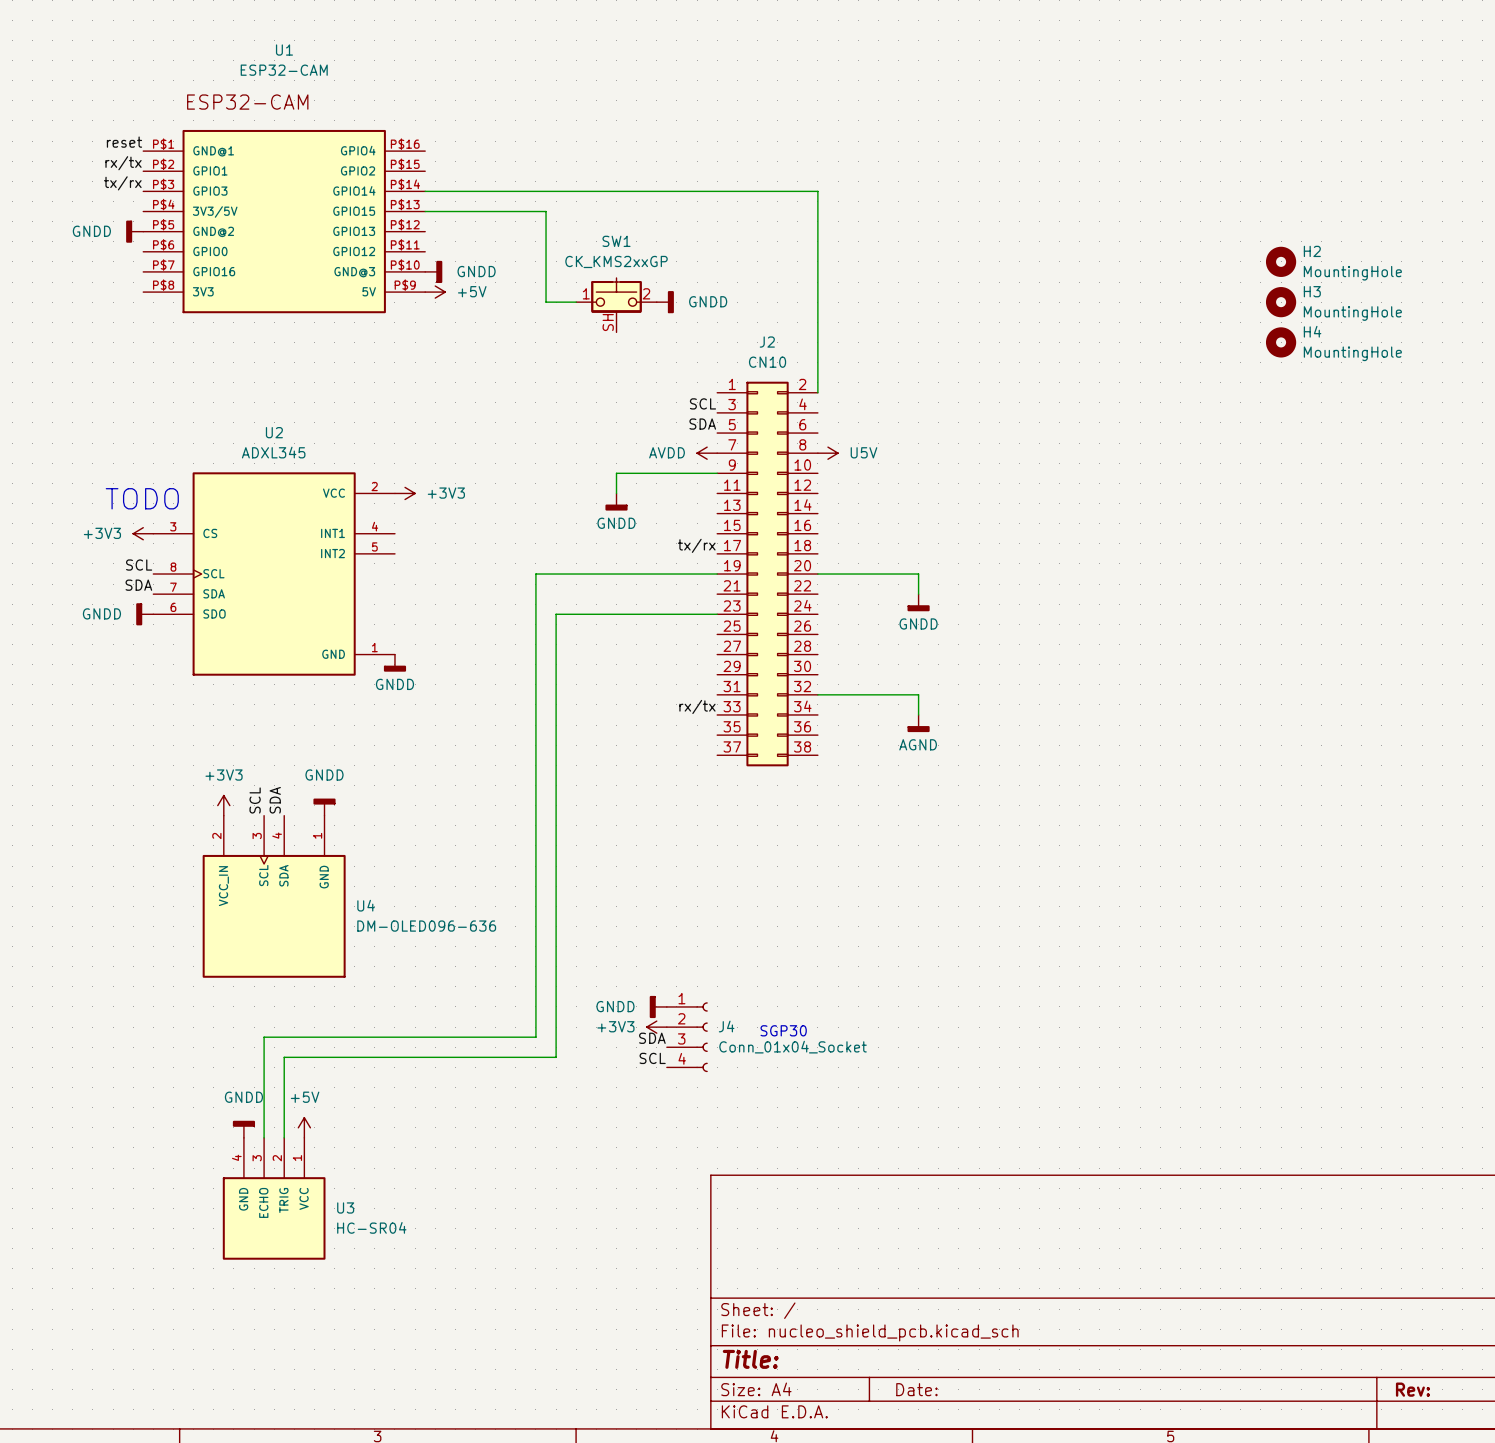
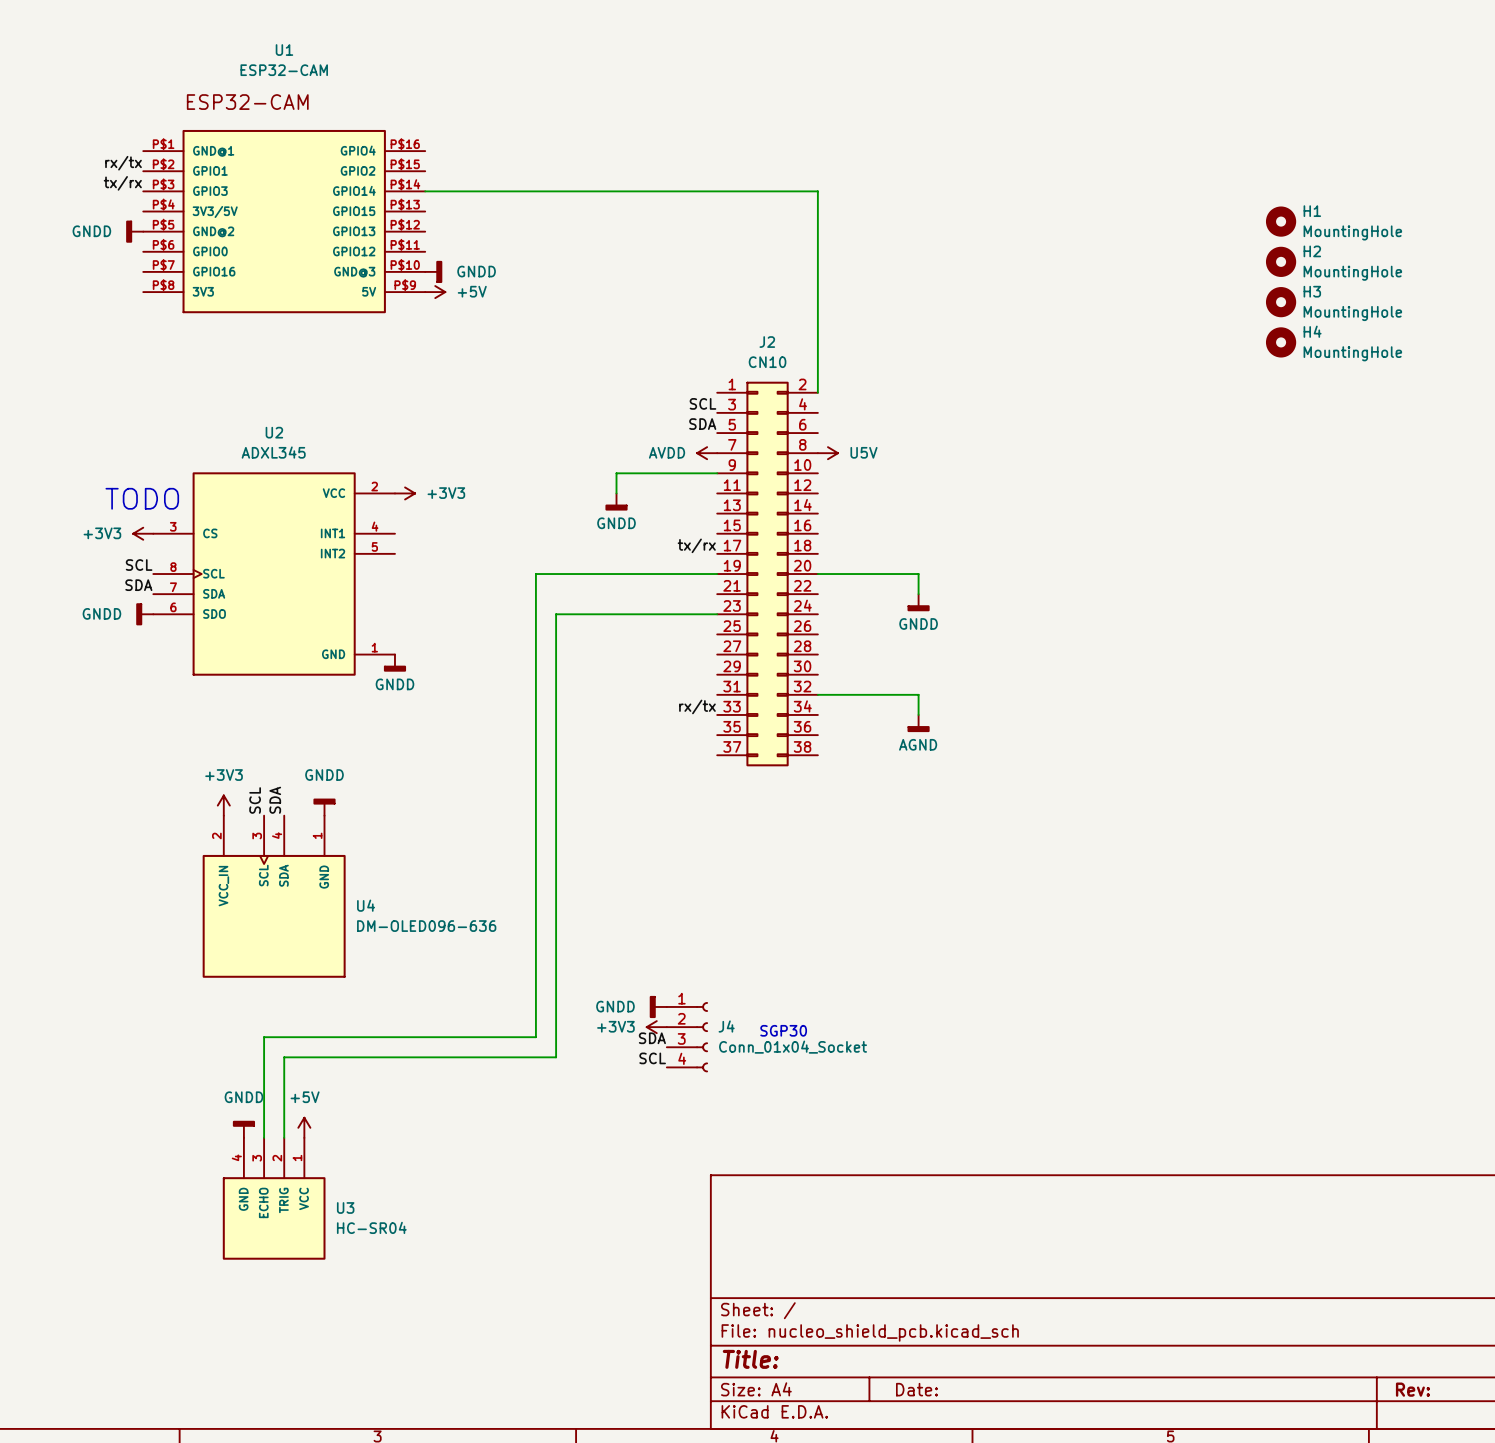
label: reset (124, 142) -> none
wire: (425, 211) (546, 211) (546, 302) (576, 302) -> none
H1: none -> MountingHole (1281, 221)
power symbol: GNDD (665, 302) -> none
SW1: CK_KMS2xxGP (616, 305) -> none

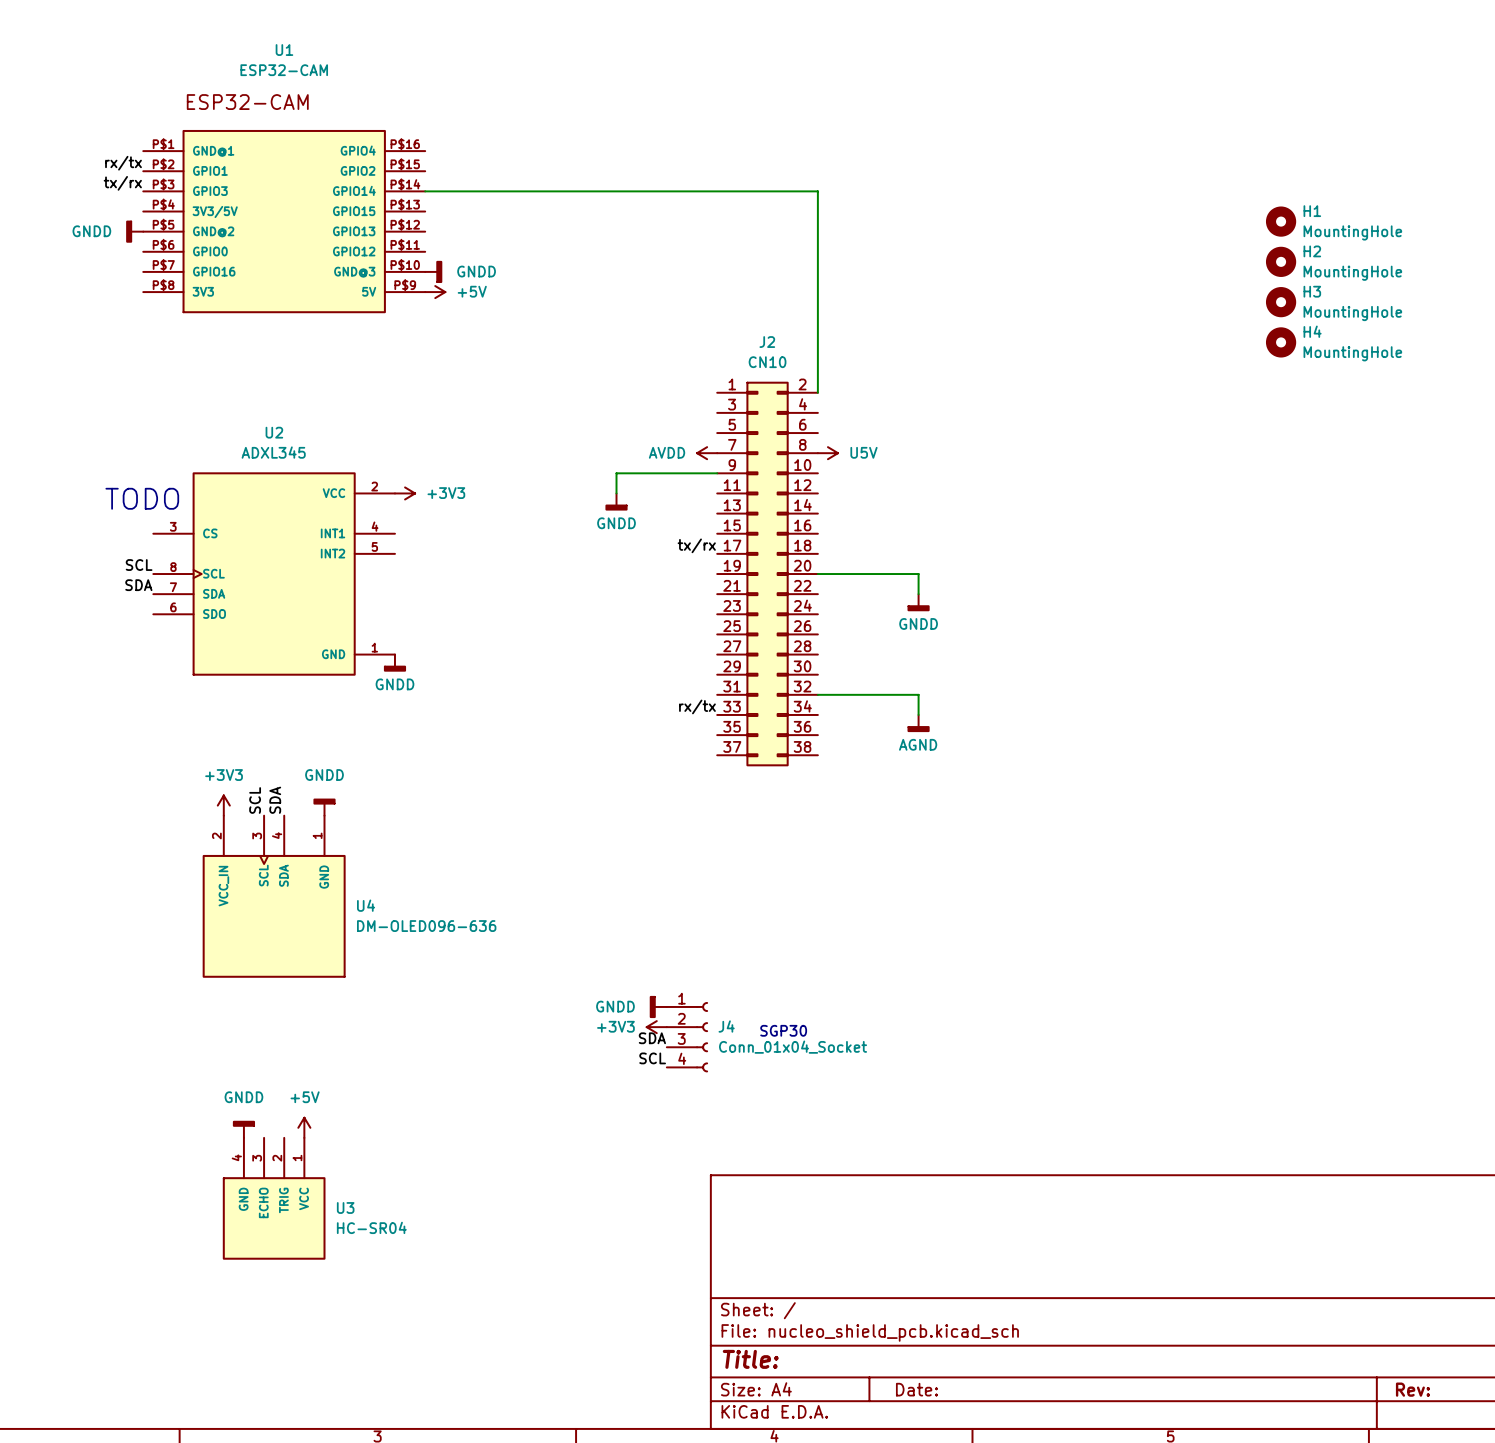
label: SCL (702, 403) -> none
label: SDA (702, 424) -> none
power symbol: +3V3 (143, 533) -> none
wire: (717, 574) (535, 574) (535, 1037) (264, 1037) (264, 1137) -> none
power symbol: GNDD (144, 614) -> none
wire: (717, 614) (556, 614) (556, 1057) (284, 1057) (284, 1137) -> none

